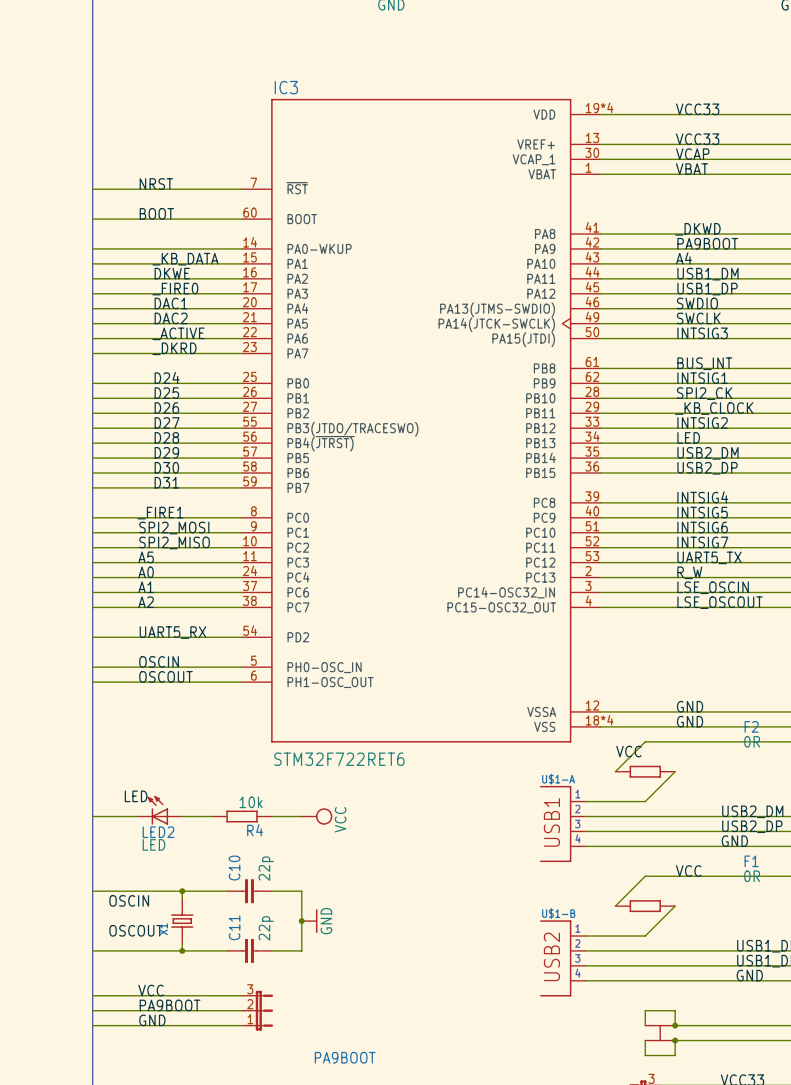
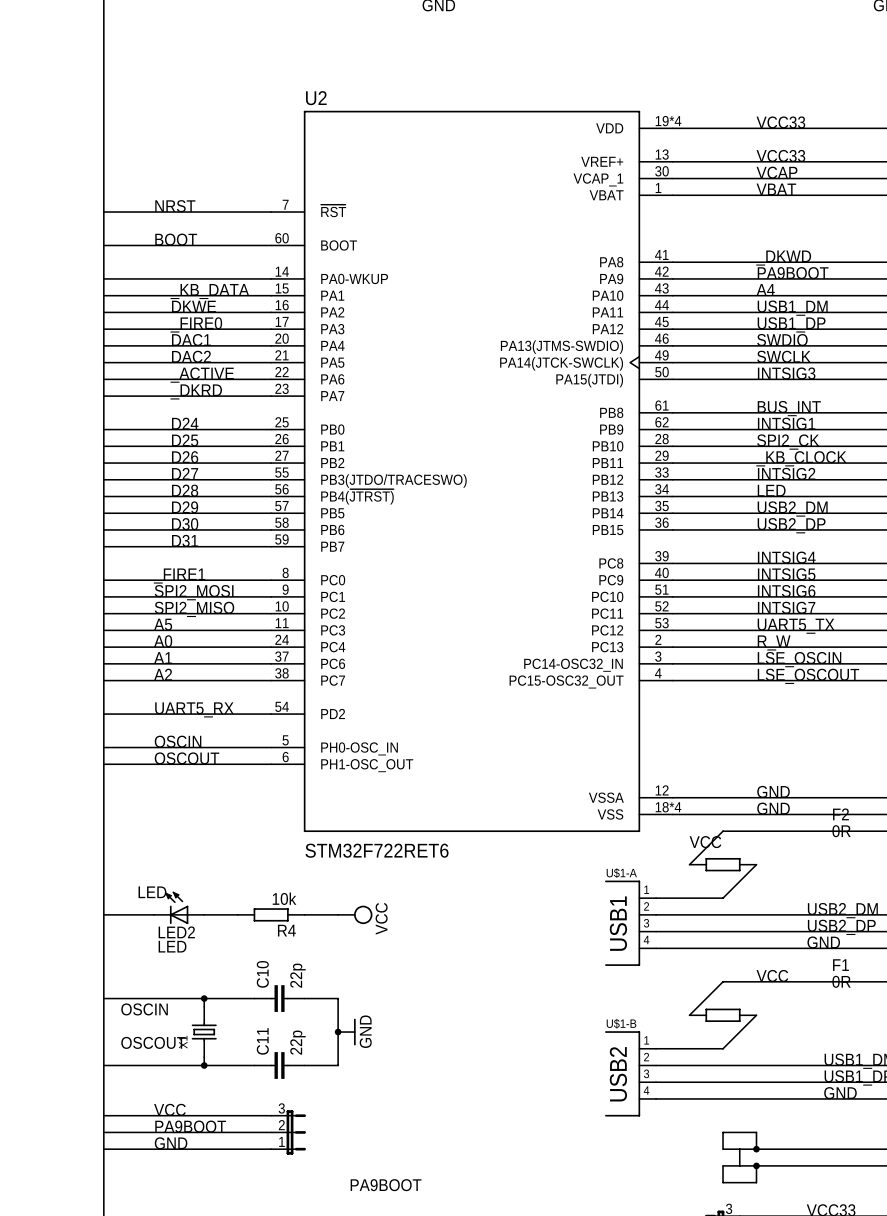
IC3 name: IC3 (286, 87) -> U2 (316, 98)

